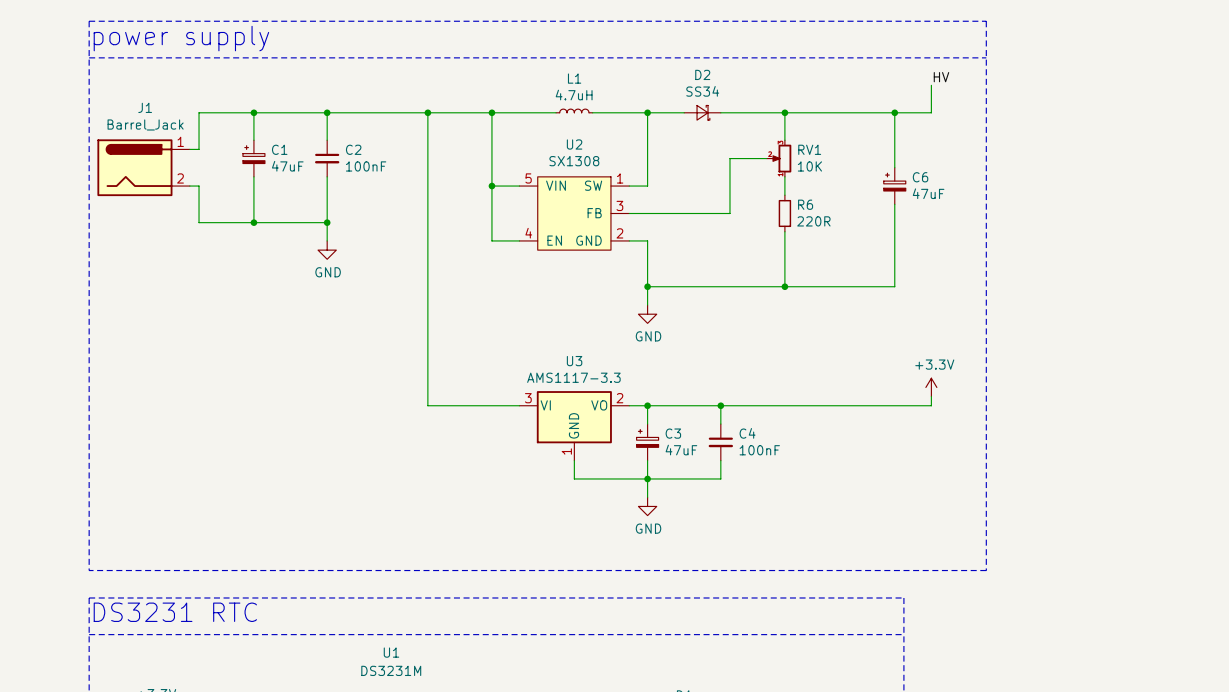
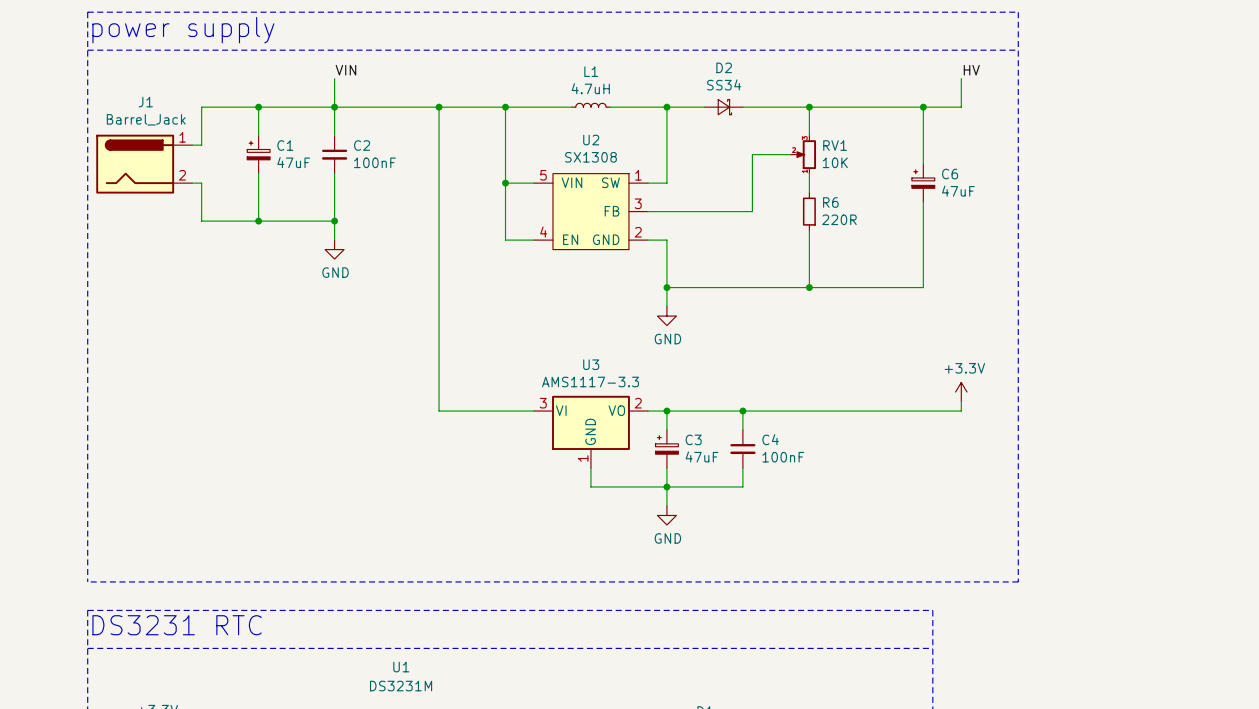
label: none -> VIN (345, 70)
wire: none -> (334, 78) (334, 107)

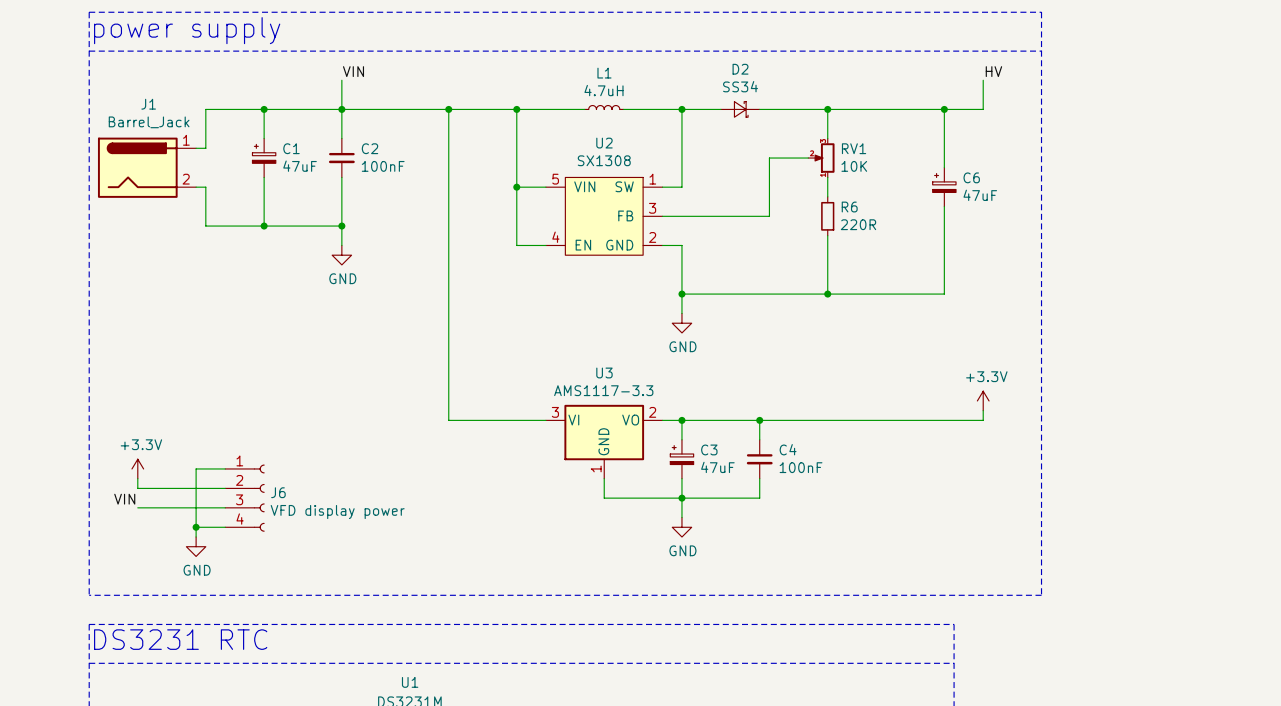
power symbol: none -> +3.3V (137, 468)
wire: none -> (225, 468) (196, 468) (196, 537)
wire: none -> (137, 478) (137, 488) (225, 488)
J6: none -> VFD display power (244, 498)
label: none -> VIN (124, 499)
wire: none -> (137, 507) (225, 507)
wire: none -> (196, 527) (225, 527)
junction: none -> (196, 527)
power symbol: none -> GND (196, 546)

